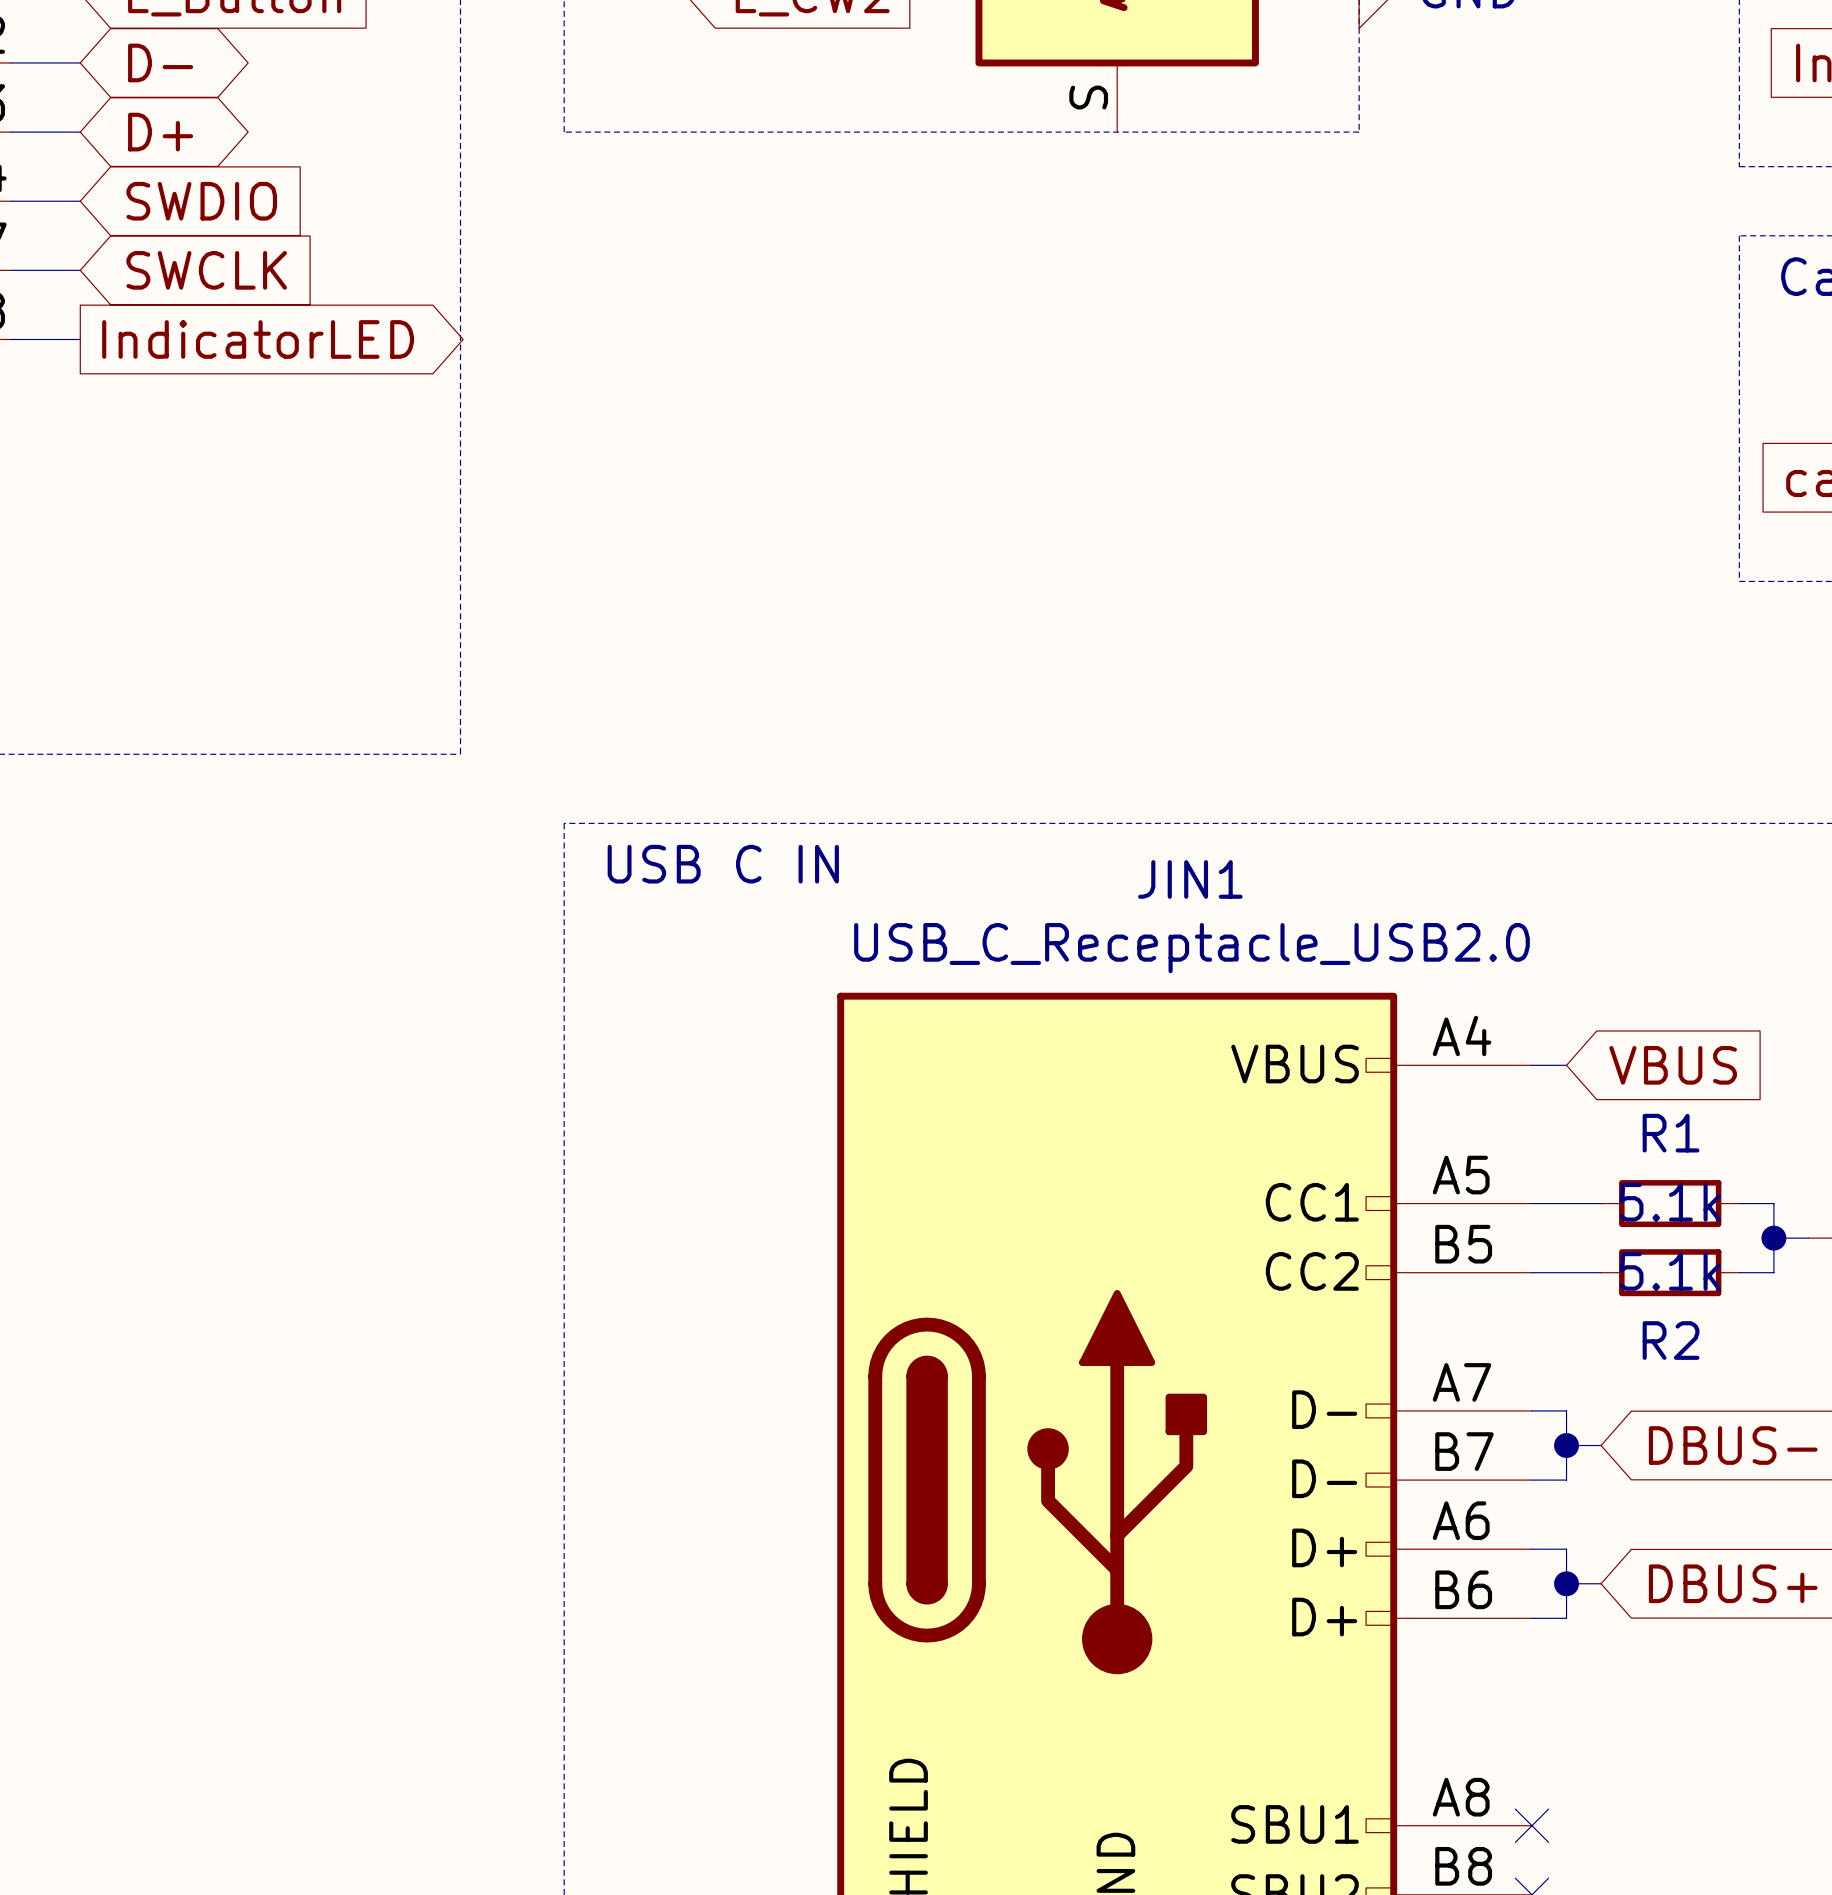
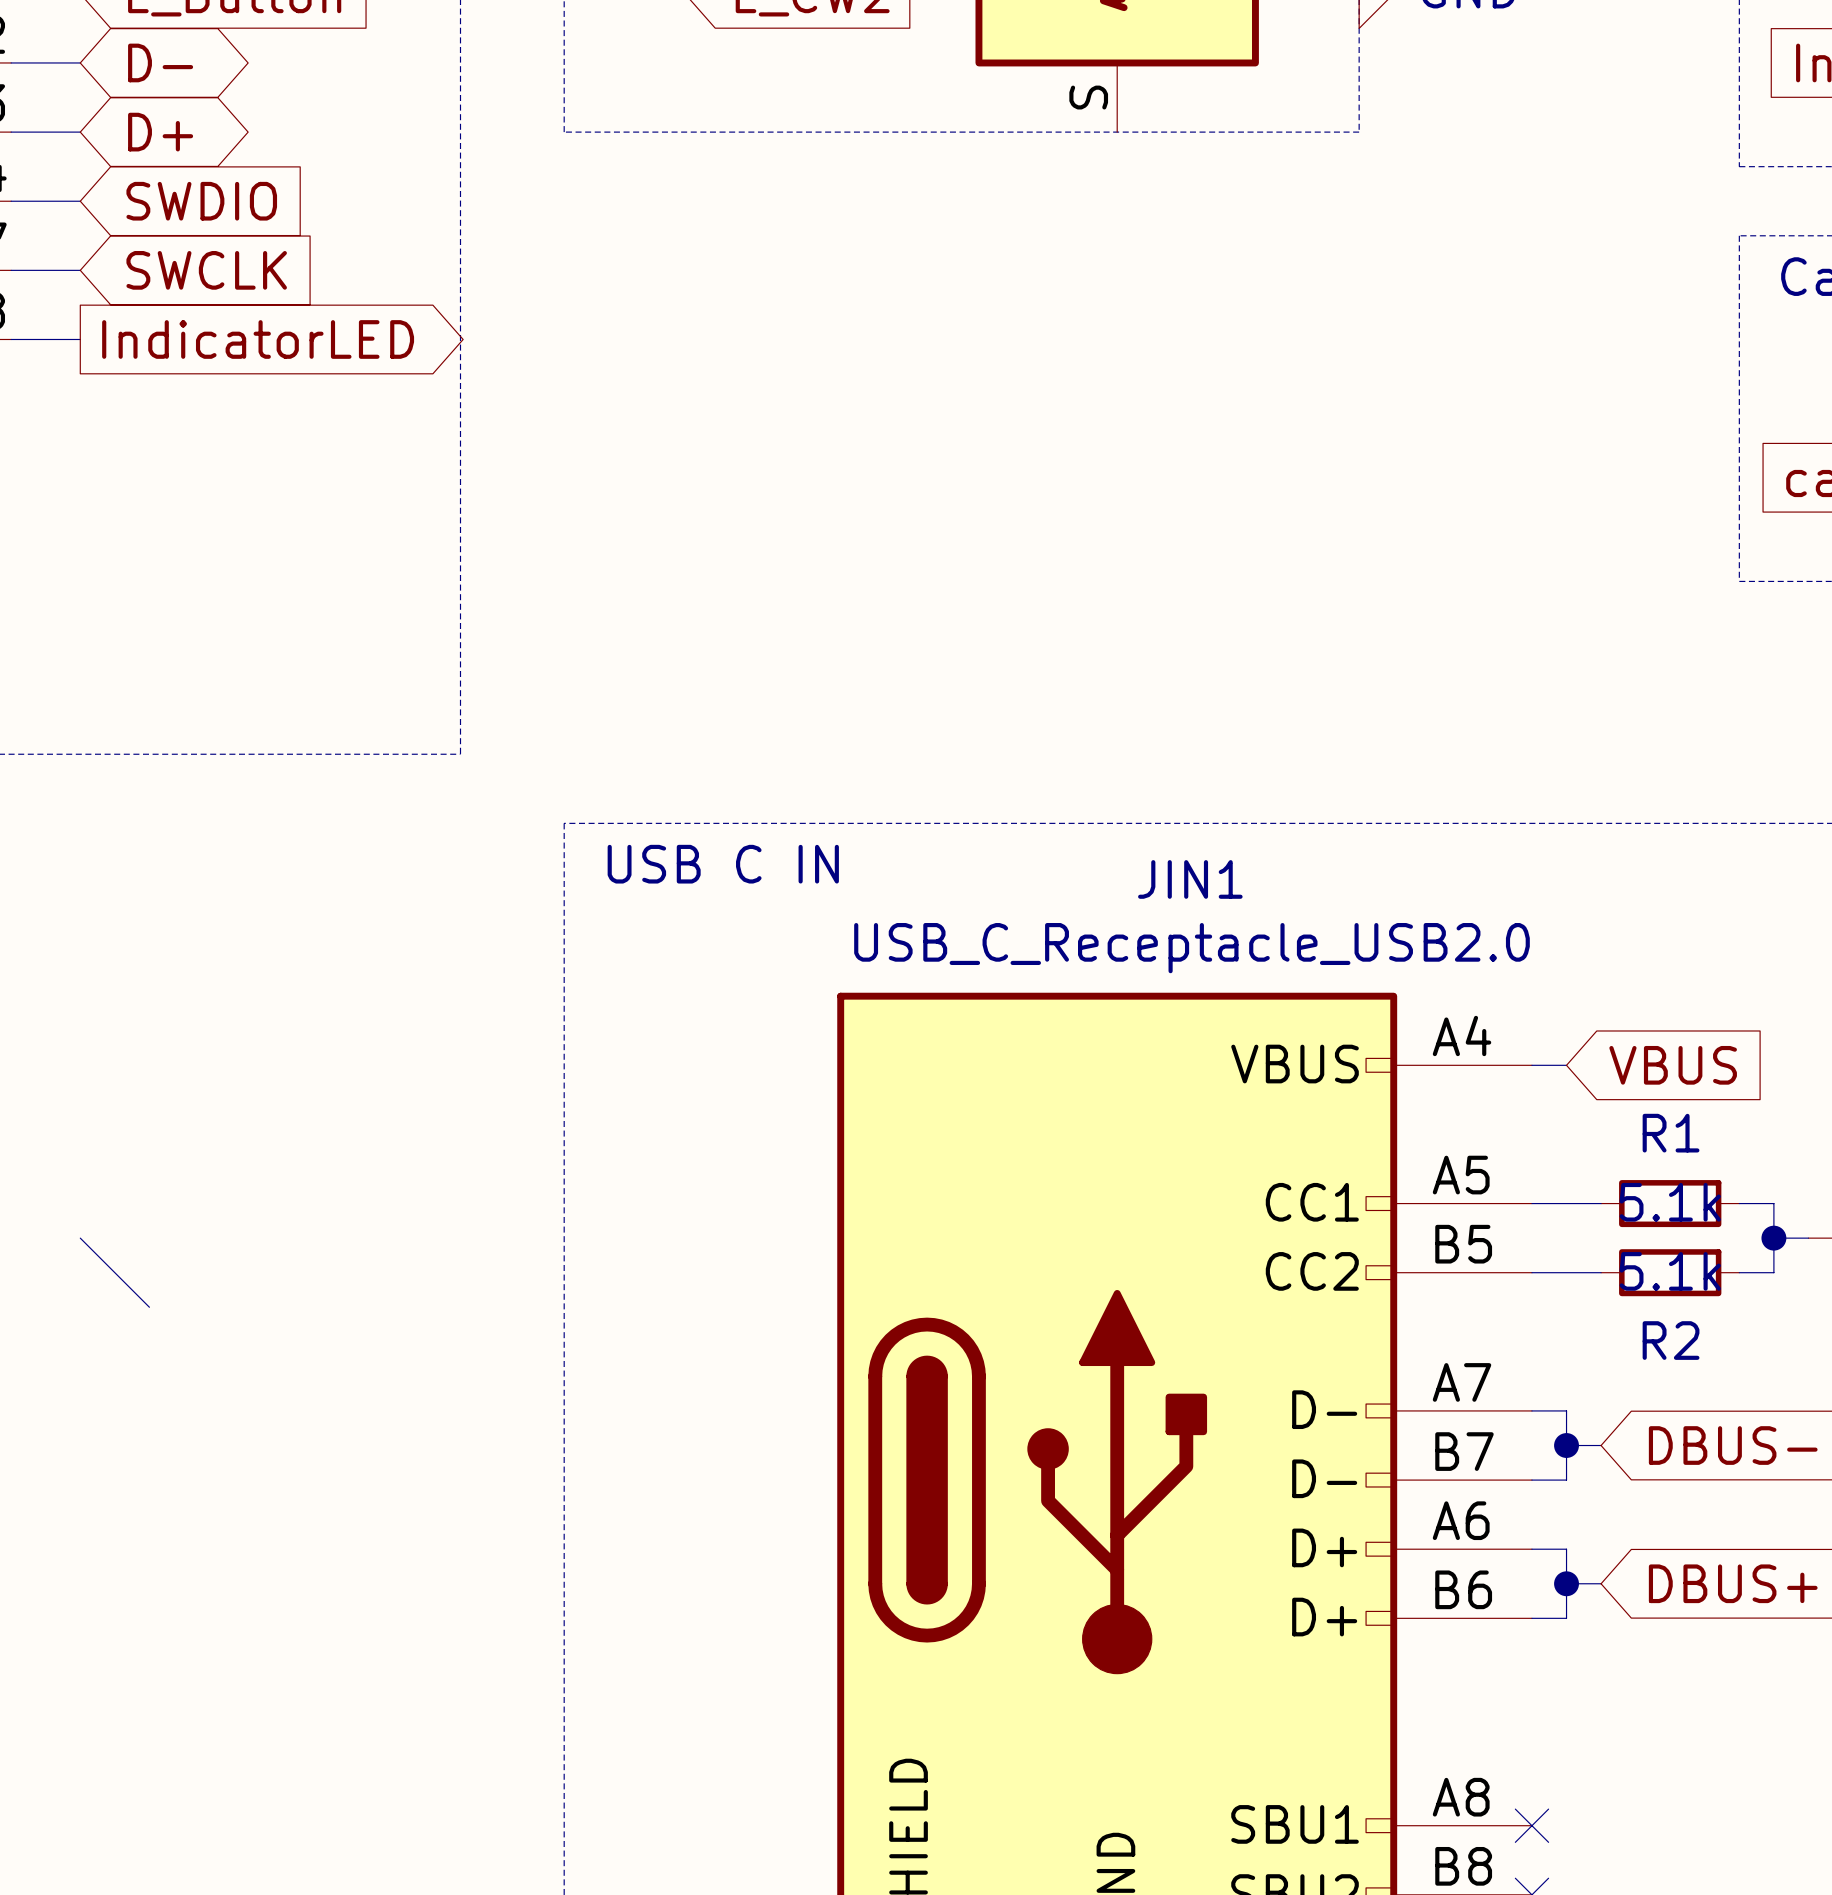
wire: none -> (80, 1238) (149, 1307)

